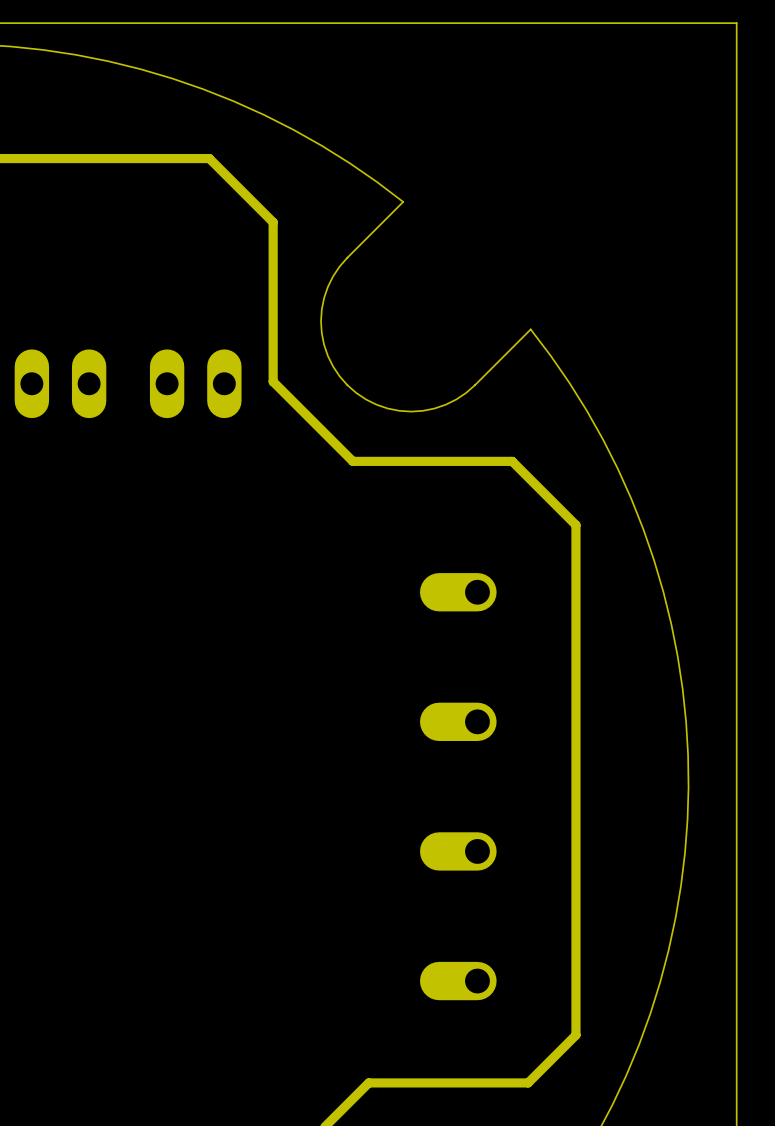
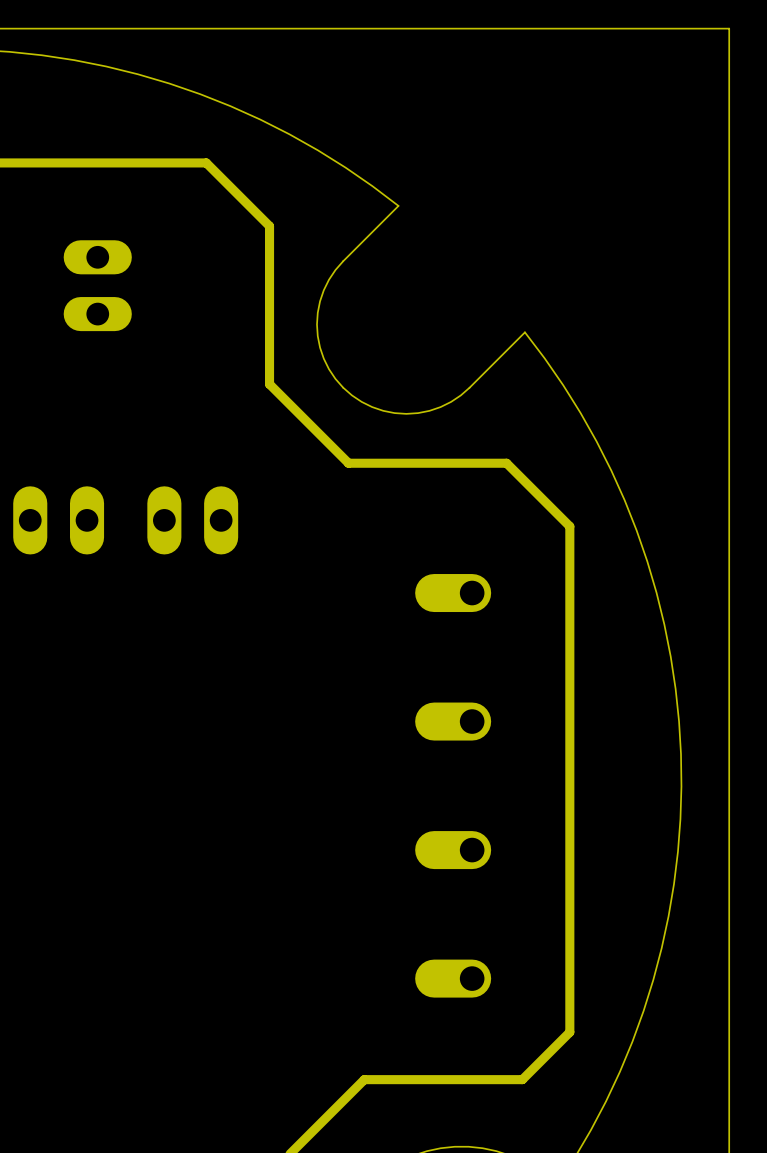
part: none -> (97, 285)
part: (60, 383) -> none
part: (195, 383) -> none
part: none -> (58, 520)
part: none -> (192, 520)

